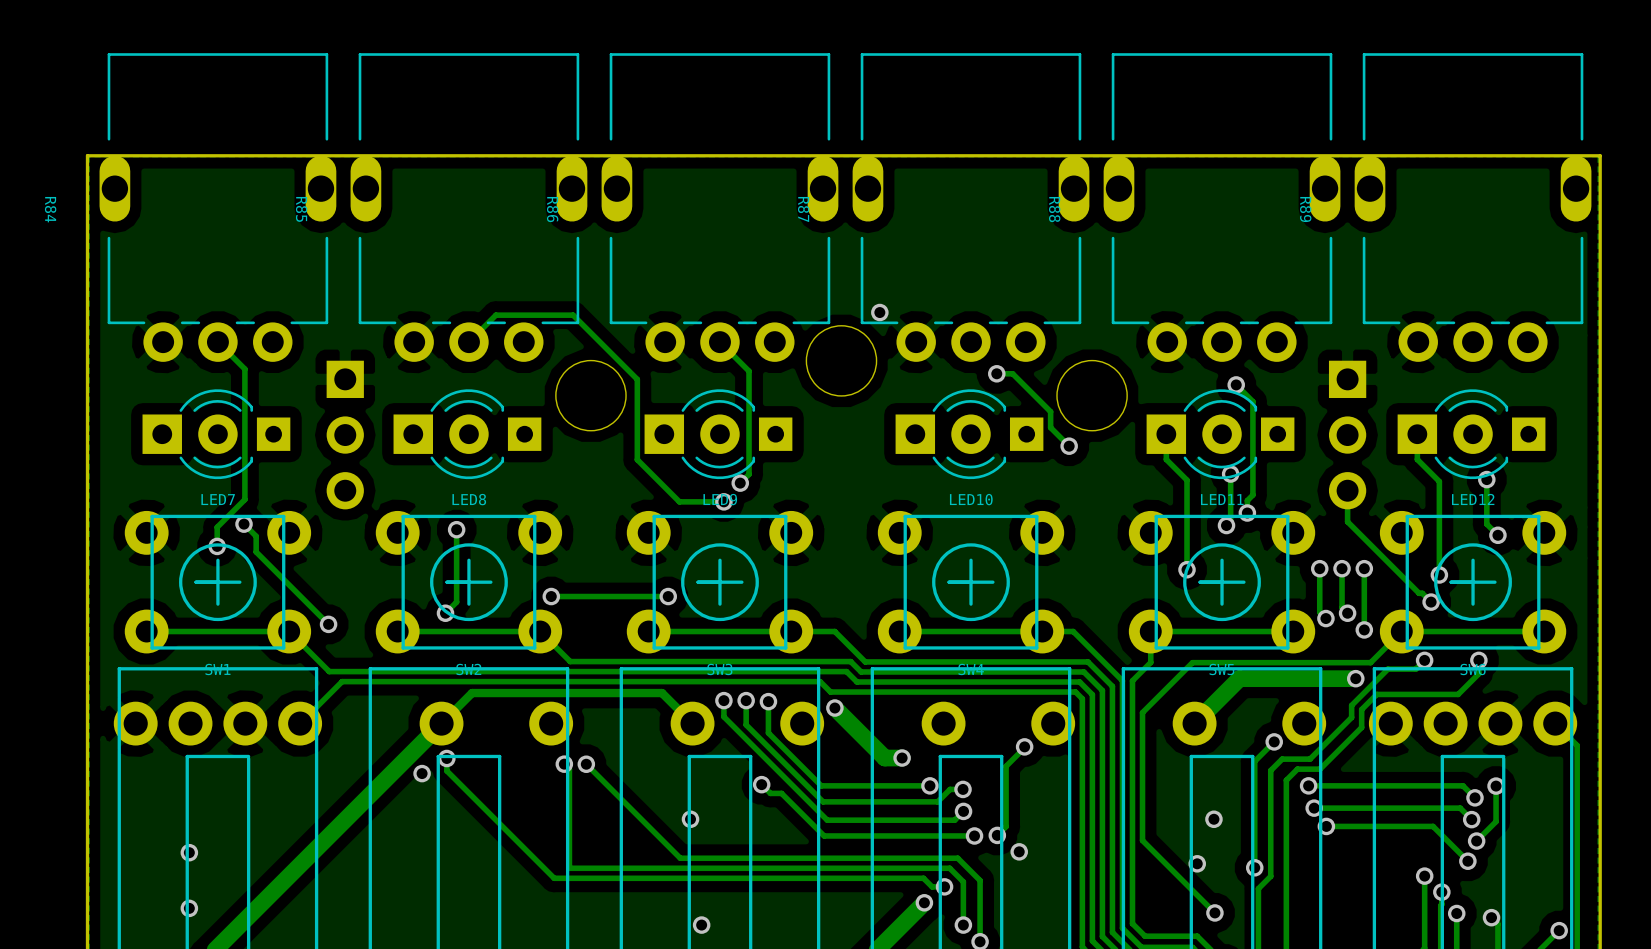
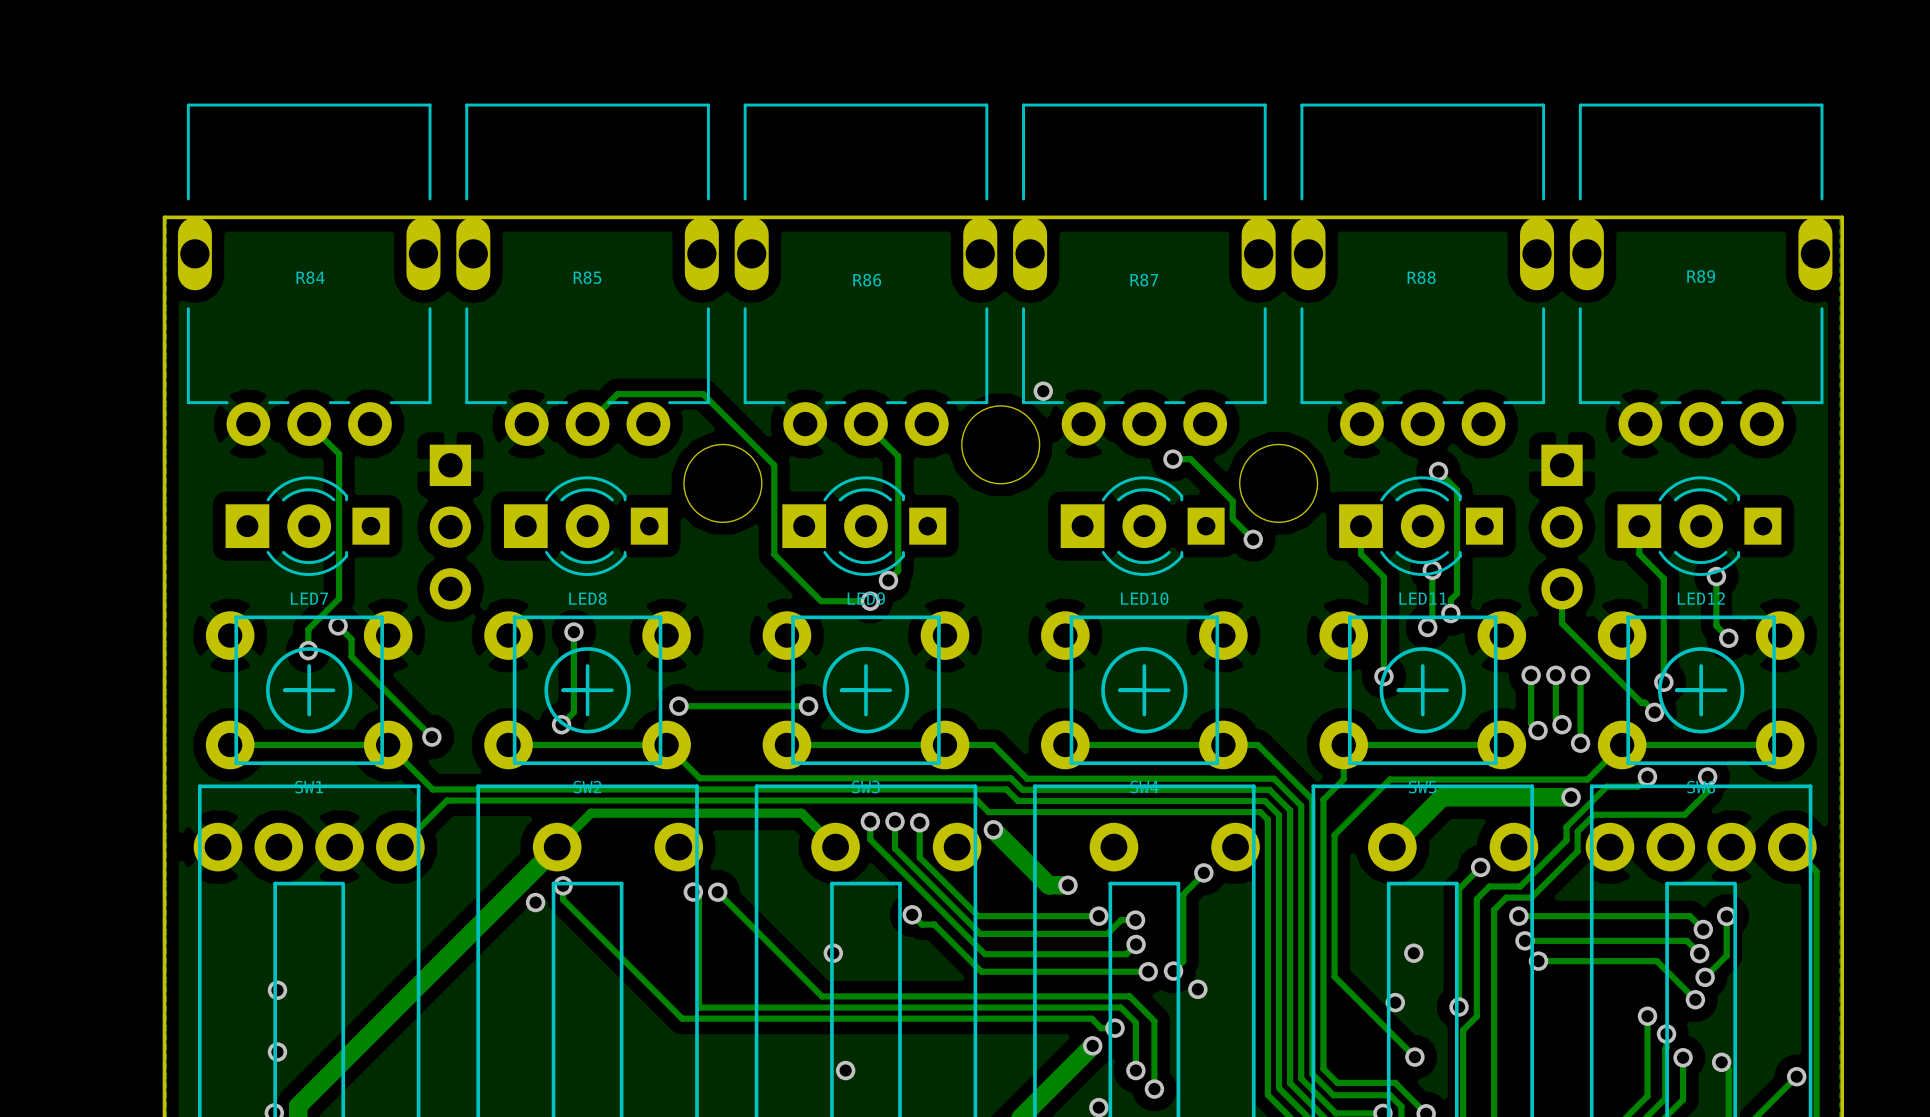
R84 name rotation: 0° (50, 209) -> 90° counterclockwise (310, 277)
R84 name position: R84 (50, 209) -> R84 (310, 277)
R85 name rotation: 0° (301, 209) -> 90° counterclockwise (587, 277)
R85 name position: R85 (301, 209) -> R85 (587, 277)
R86 name rotation: 0° (552, 209) -> 90° counterclockwise (867, 280)
R86 name position: R86 (552, 209) -> R86 (867, 280)
R87 name rotation: 0° (803, 209) -> 90° counterclockwise (1144, 280)
R87 name position: R87 (803, 209) -> R87 (1144, 280)
R88 name rotation: 0° (1054, 209) -> 90° counterclockwise (1421, 277)
R88 name position: R88 (1054, 209) -> R88 (1421, 277)
R89 name rotation: 0° (1305, 209) -> 90° counterclockwise (1701, 276)
R89 name position: R89 (1305, 209) -> R89 (1701, 276)

